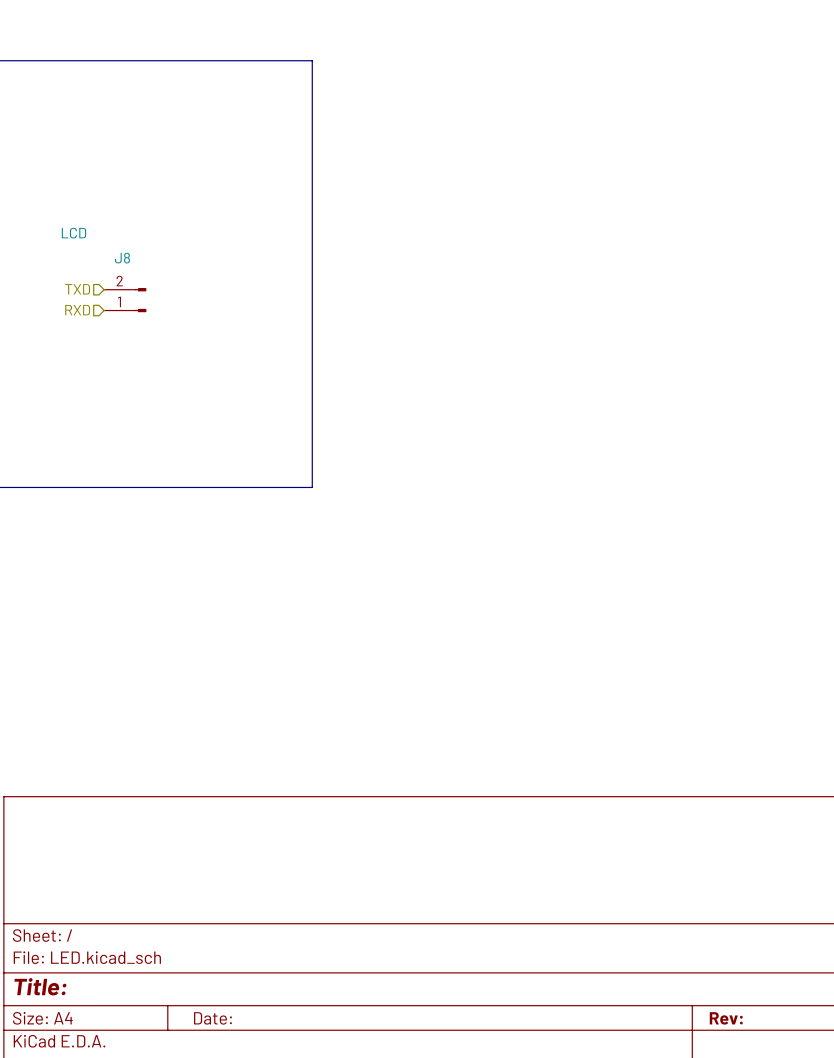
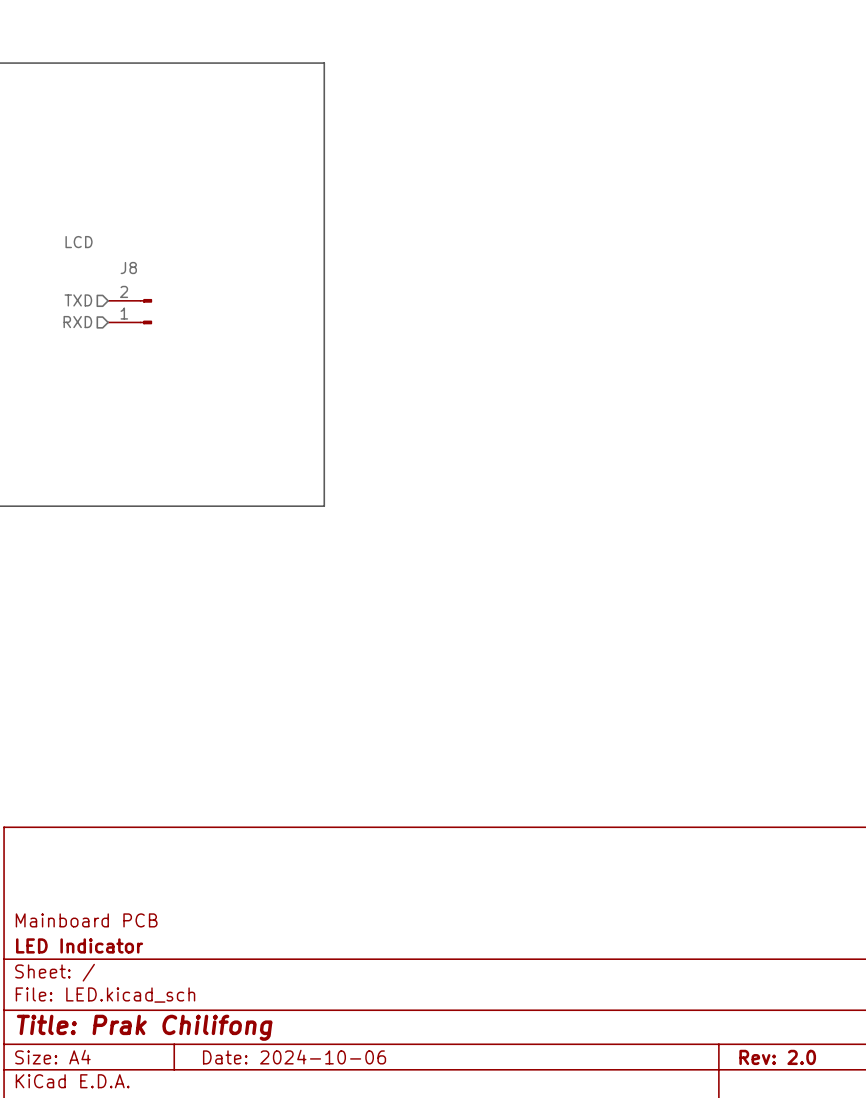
title block: none -> Mainboard PCB (86, 920)
title block: none -> LED Indicator (79, 945)
title block: Title: (40, 986) -> Title: Prak Chilifong (144, 1027)
title block: Date: (212, 1018) -> Date: 2024-10-06 (294, 1057)
title block: Rev: (726, 1018) -> Rev: 2.0 (777, 1057)

